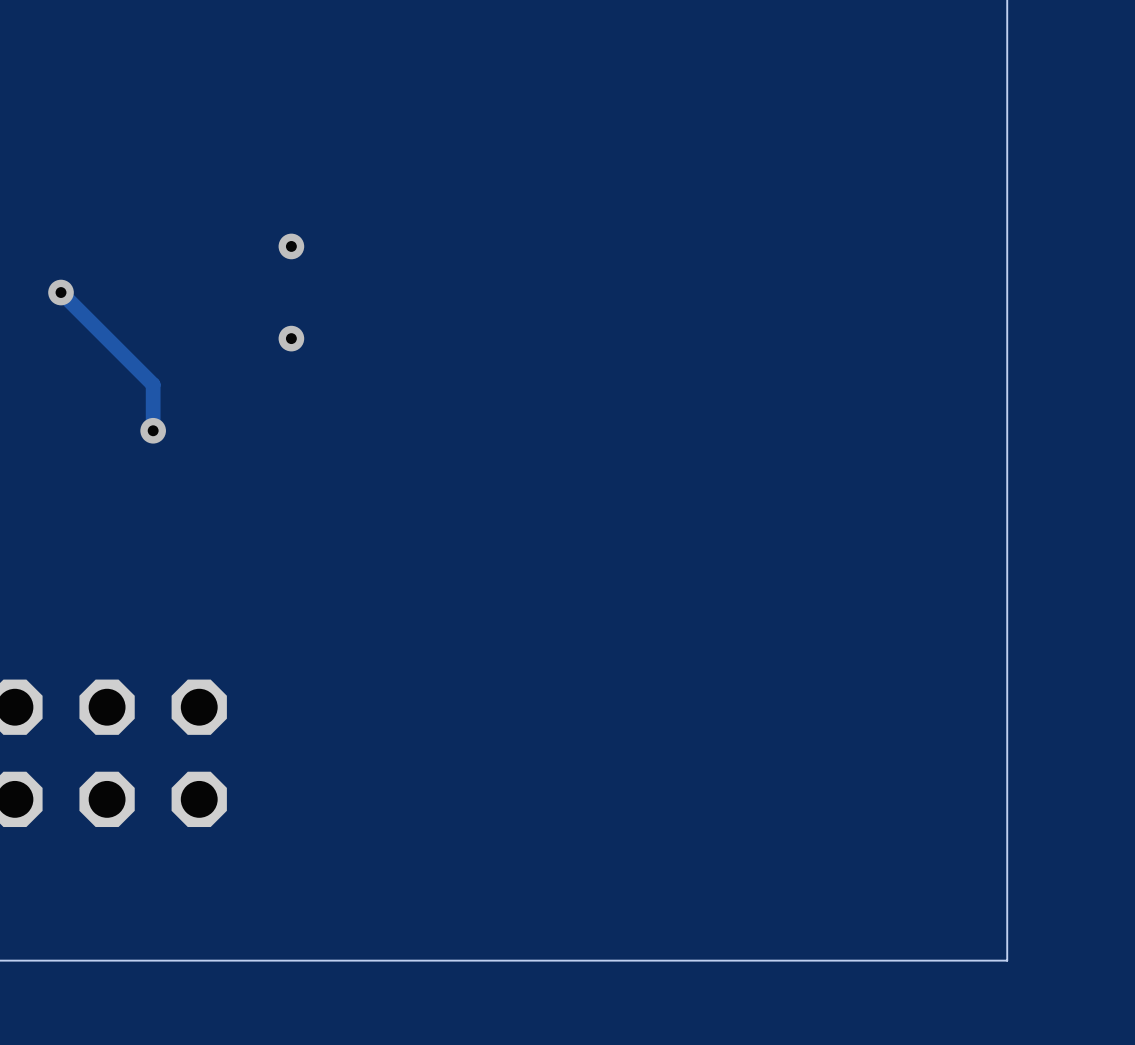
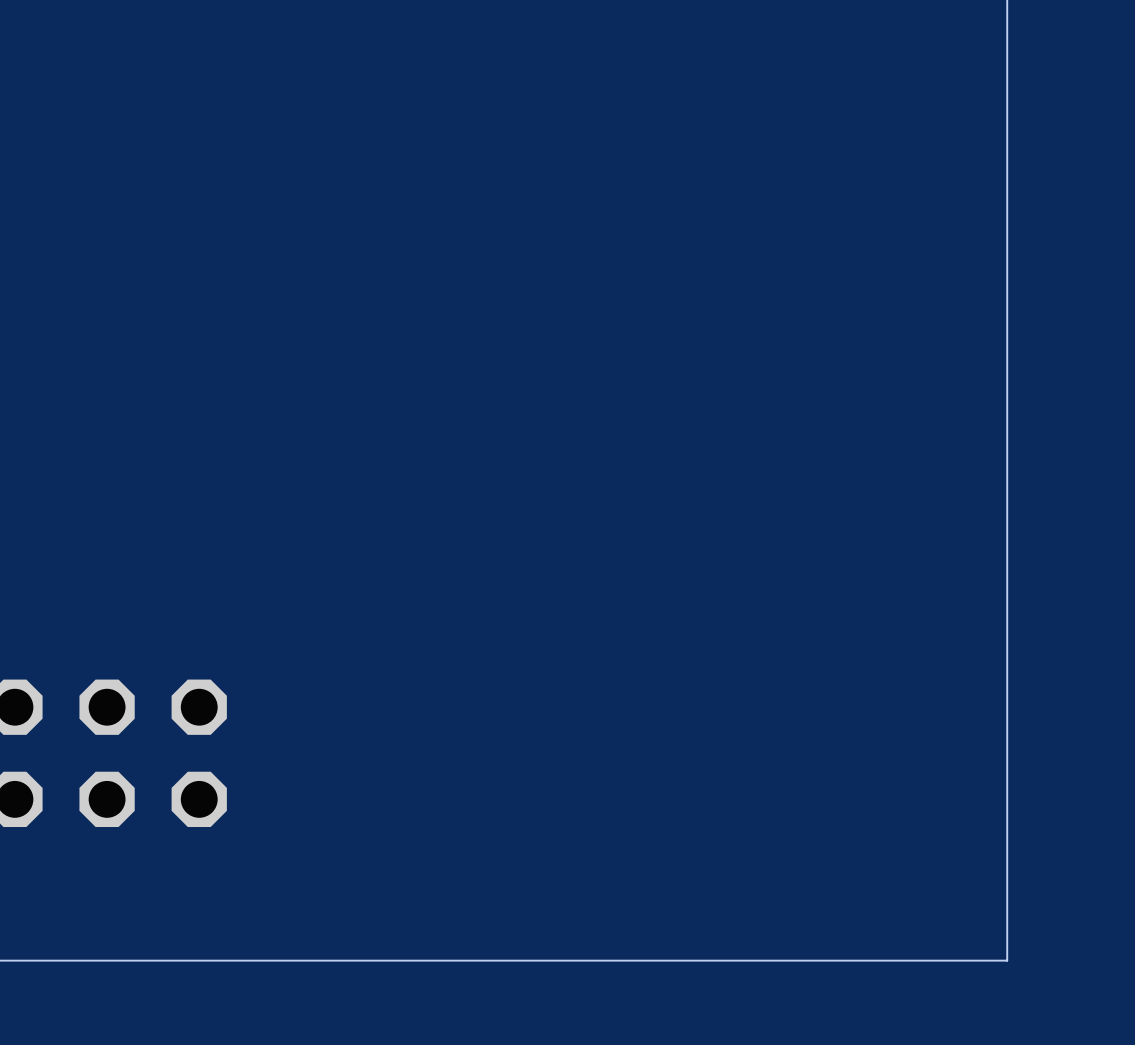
via: (291, 246) -> none
track: (61, 292) (153, 384) (153, 430) -> none
via: (61, 292) -> none
via: (291, 338) -> none
via: (153, 430) -> none

